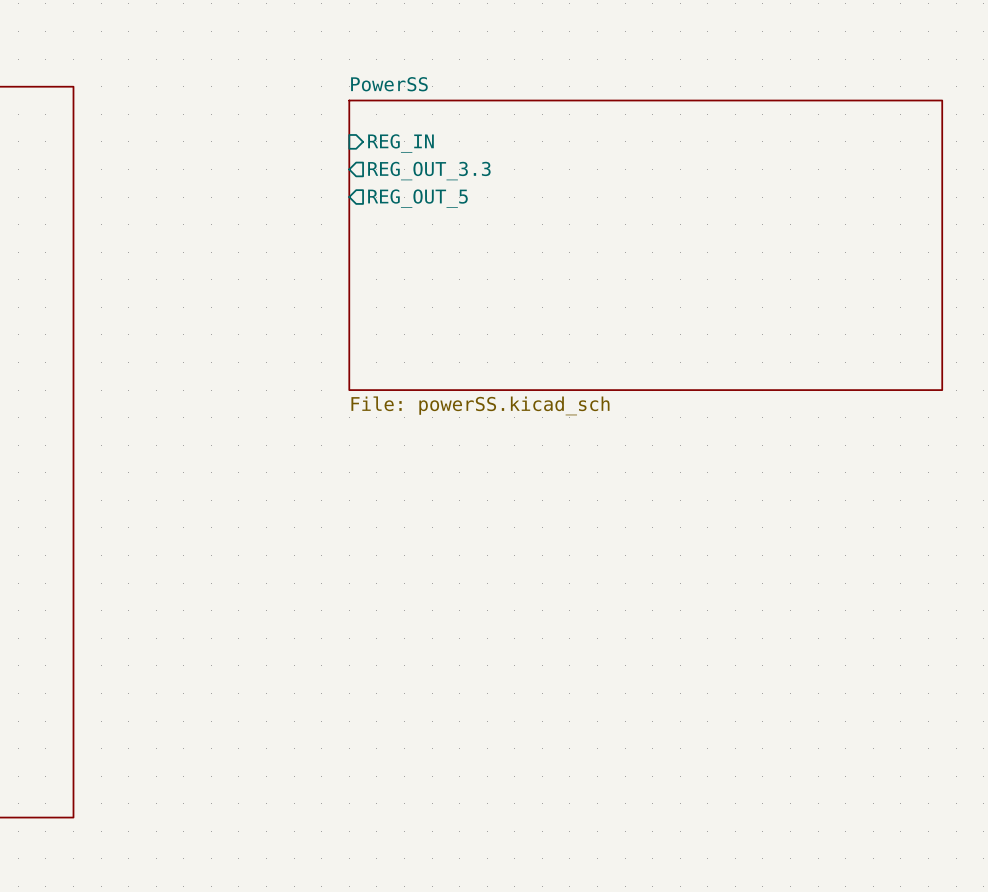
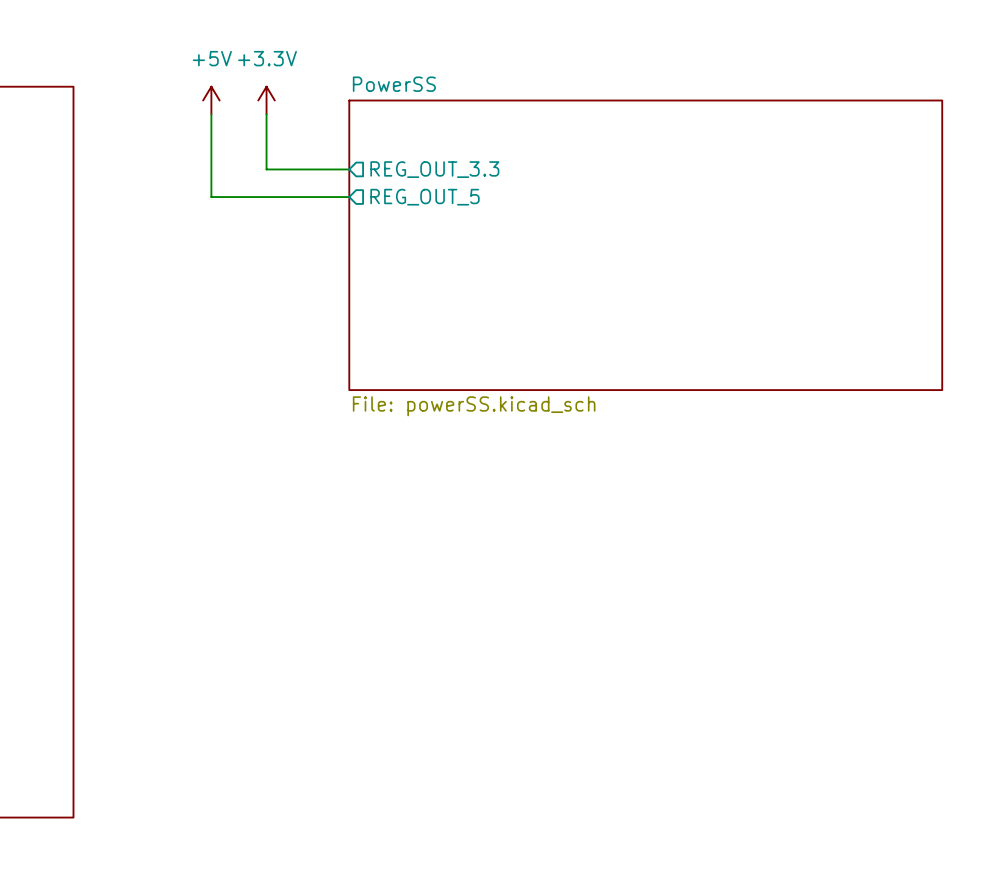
power symbol: none -> +5V (211, 100)
power symbol: none -> +3.3V (266, 100)
wire: none -> (211, 114) (211, 197) (349, 197)
wire: none -> (266, 114) (266, 169) (349, 169)
sheet pin: REG_IN (400, 143) -> none

